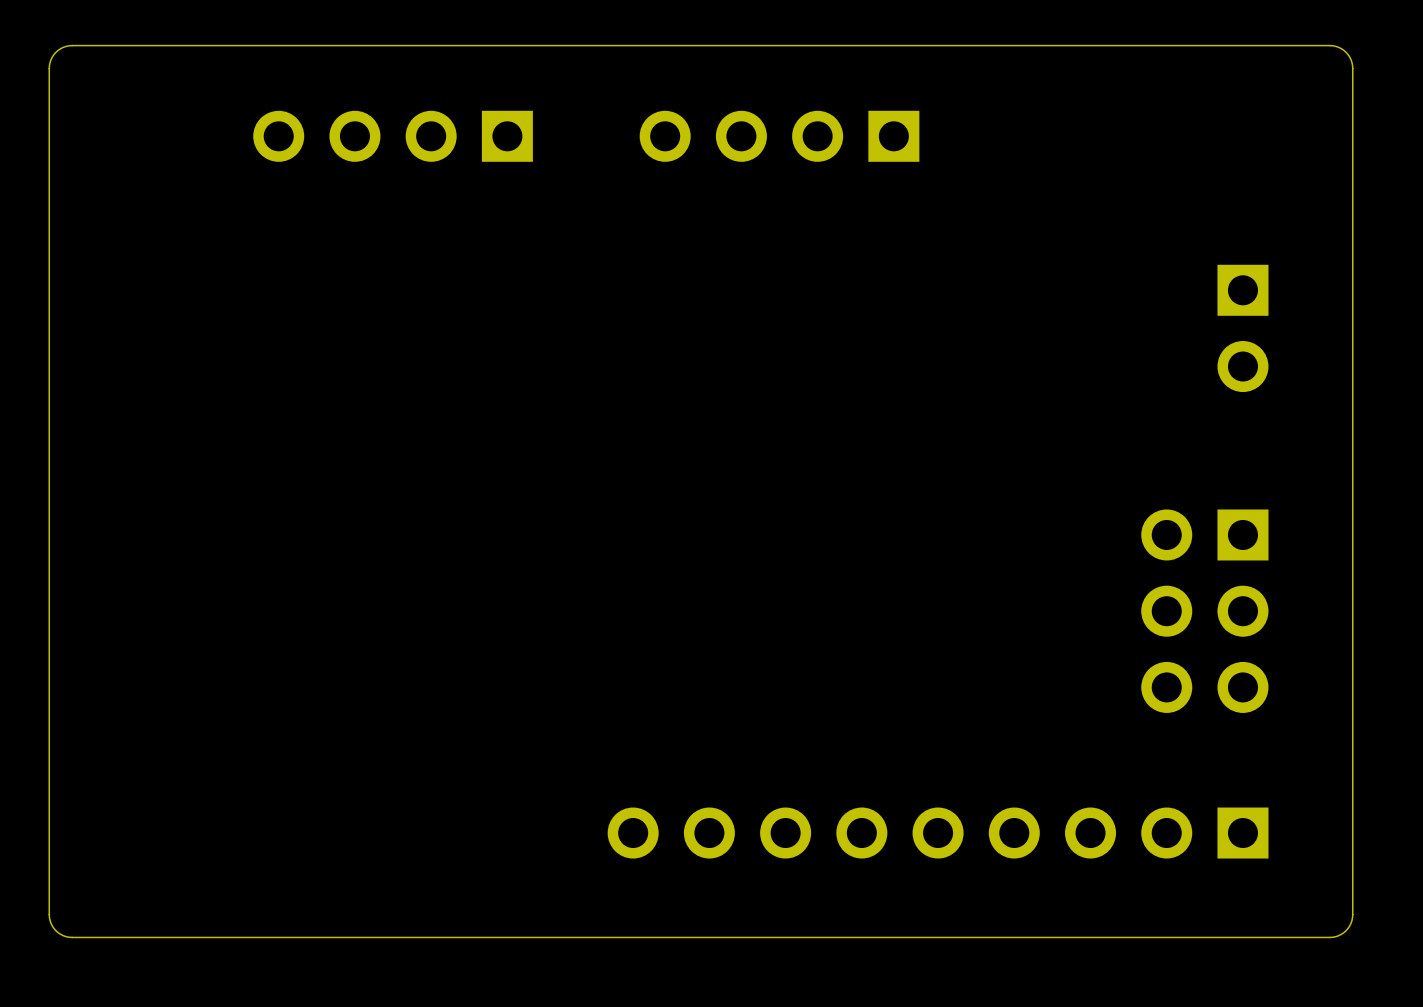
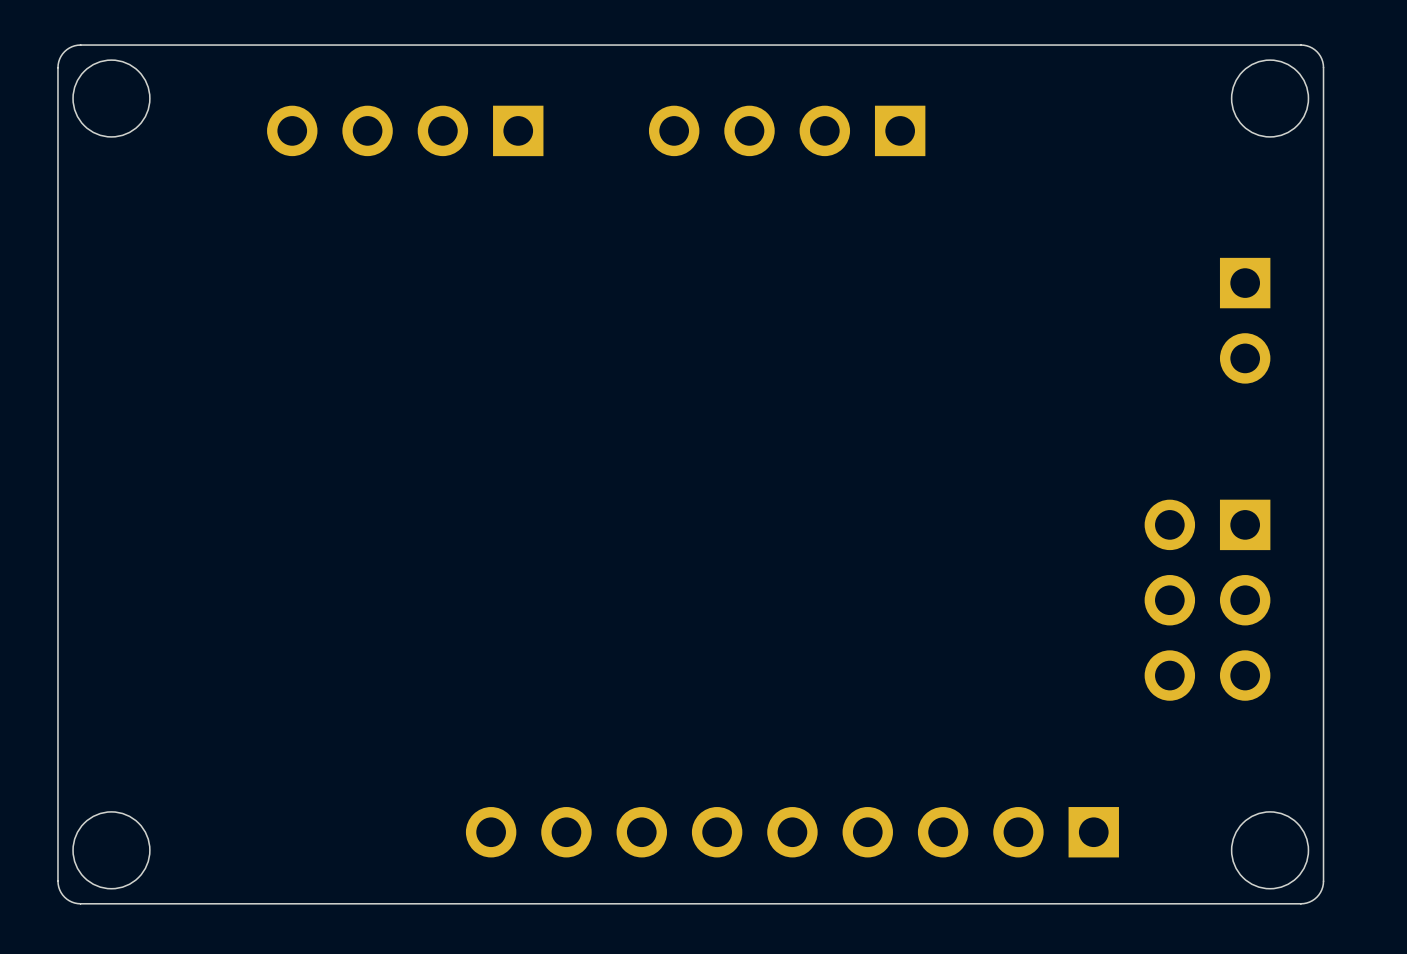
board edge: (1329, 45) (72, 45) (58, 50) (51, 59) (49, 68) (49, 914) (54, 928) (63, 935) (72, 937) (1329, 937) (1343, 932) (1349, 926) (1352, 914) (1352, 68) (1351, 59) (1346, 52) (1338, 47) (1329, 45) -> (1300, 45) (1309, 46) (1316, 51) (1321, 58) (1323, 67) (1323, 881) (1320, 892) (1314, 899) (1300, 903) (80, 903) (71, 902) (62, 894) (57, 881) (57, 67) (59, 58) (66, 49) (80, 45) (1300, 45)
round board edge: none -> [72, 59, 151, 138]
round board edge: none -> [1230, 59, 1310, 138]
round board edge: none -> [72, 811, 151, 890]
round board edge: none -> [1230, 811, 1310, 890]
part position: (938, 833) -> (792, 832)

